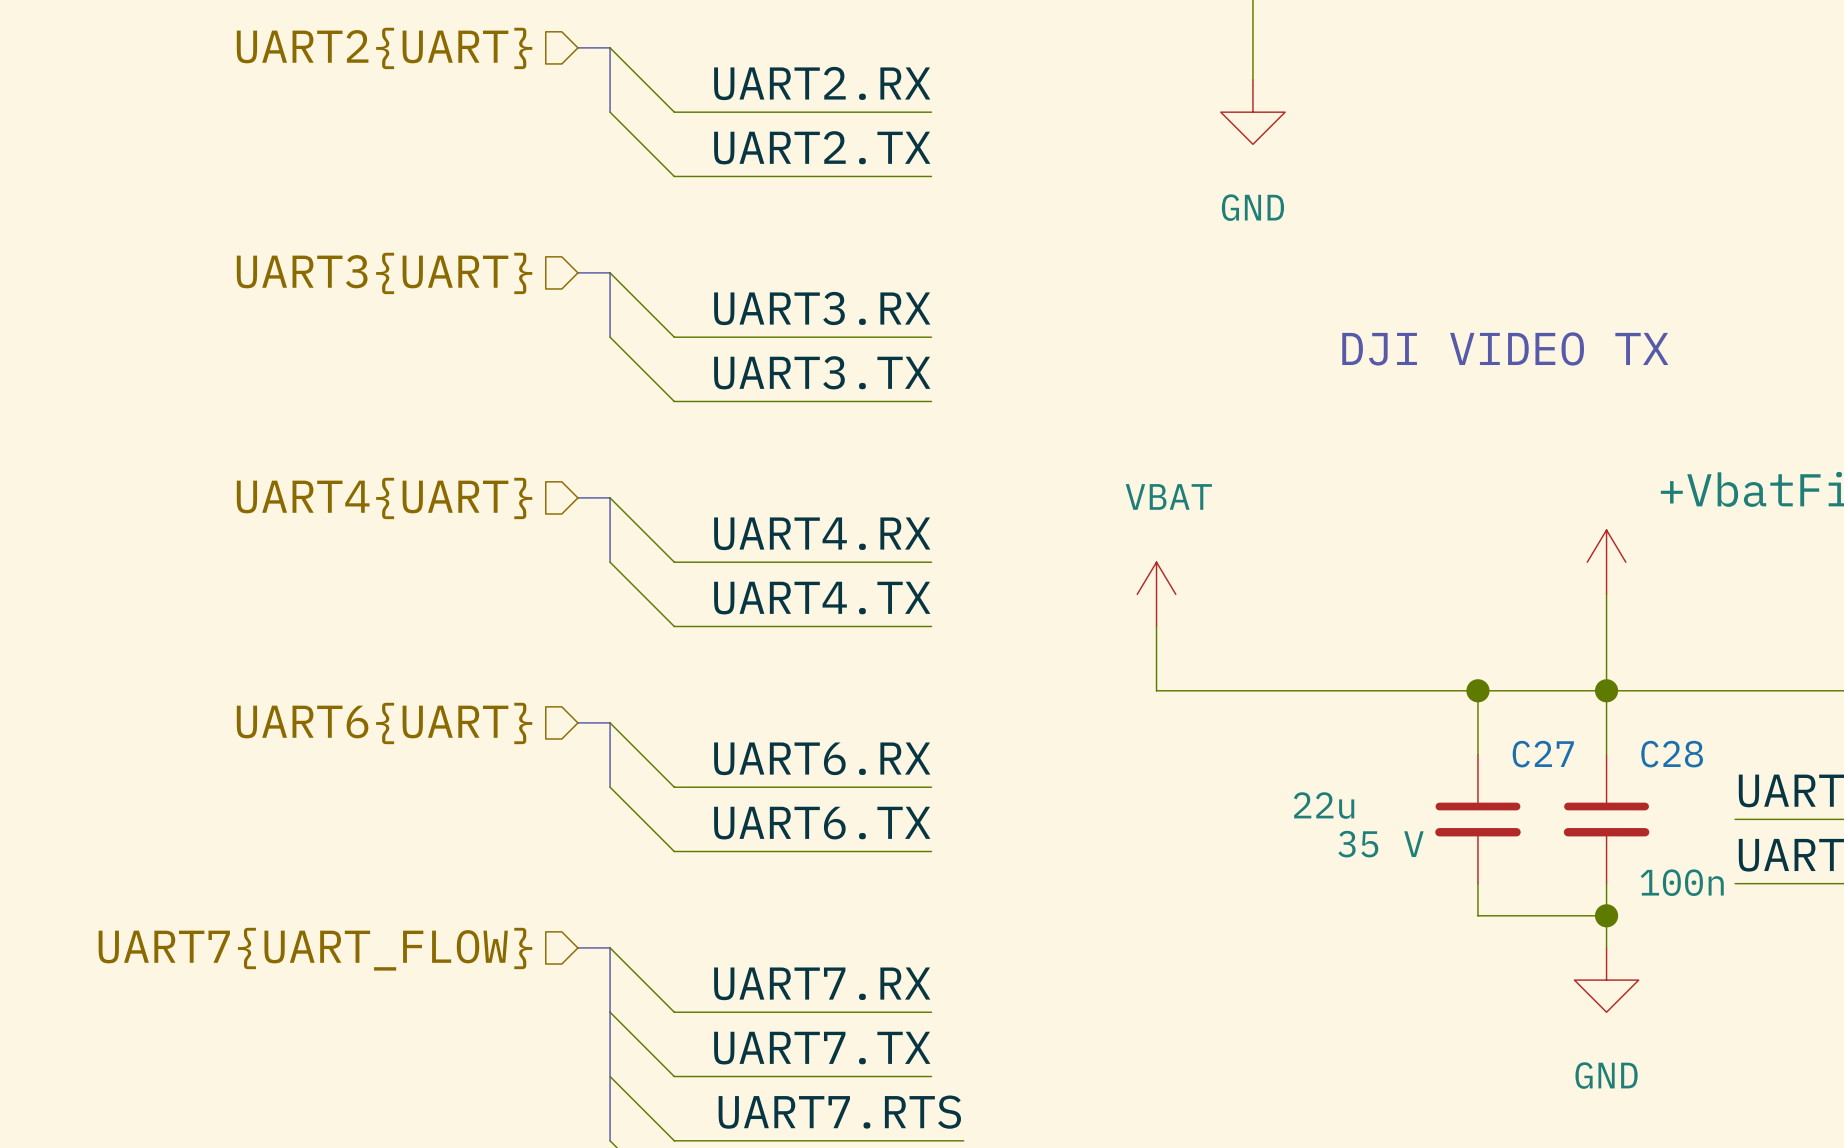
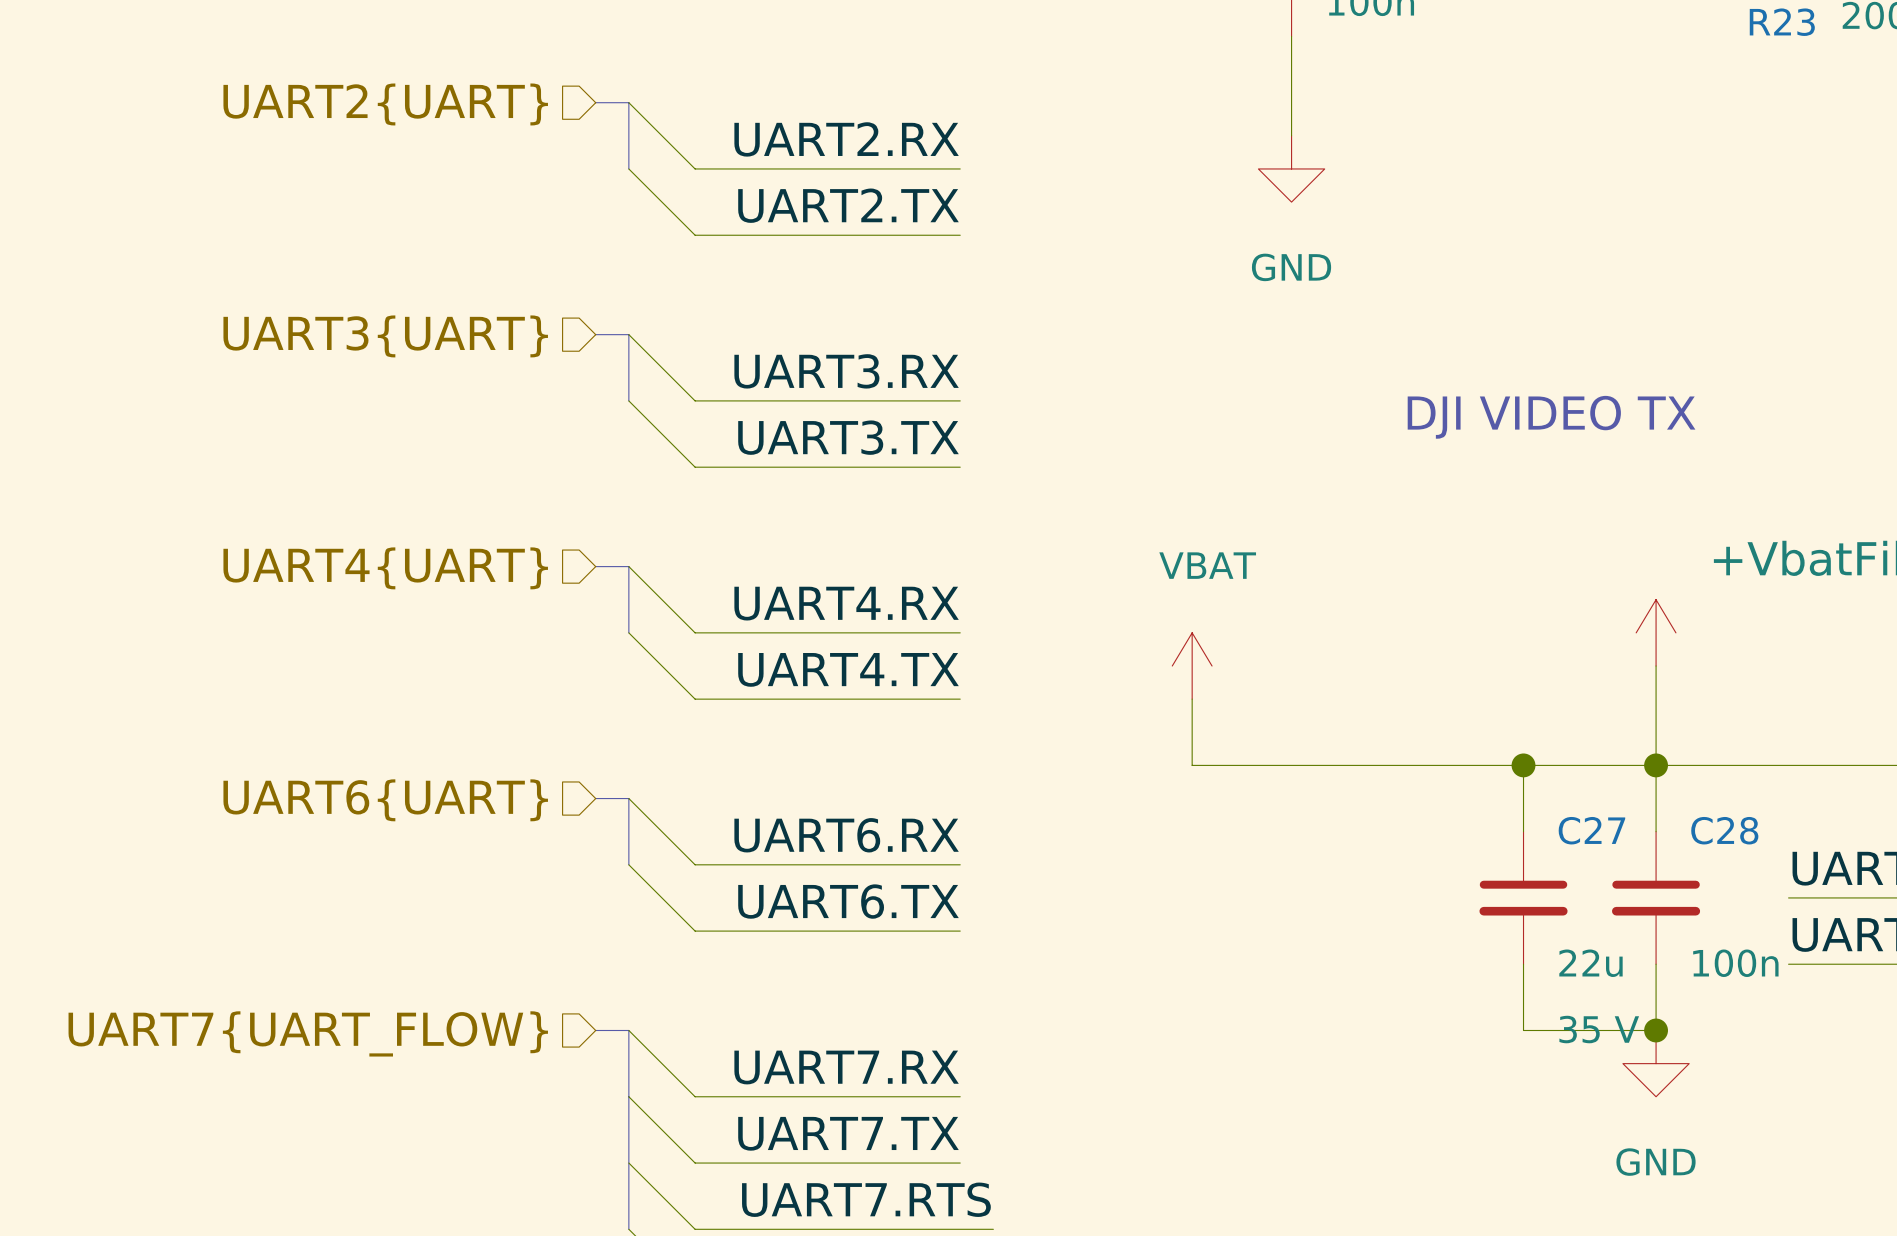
C27 value position: 22u (1324, 805) -> 22u (1590, 963)
C27 text position: 35 V (1380, 844) -> 35 V (1599, 1029)
wire: (1477, 915) (1606, 915) -> (1523, 997) (1523, 1030) (1656, 1030)
junction position: (1606, 915) -> (1656, 1030)

